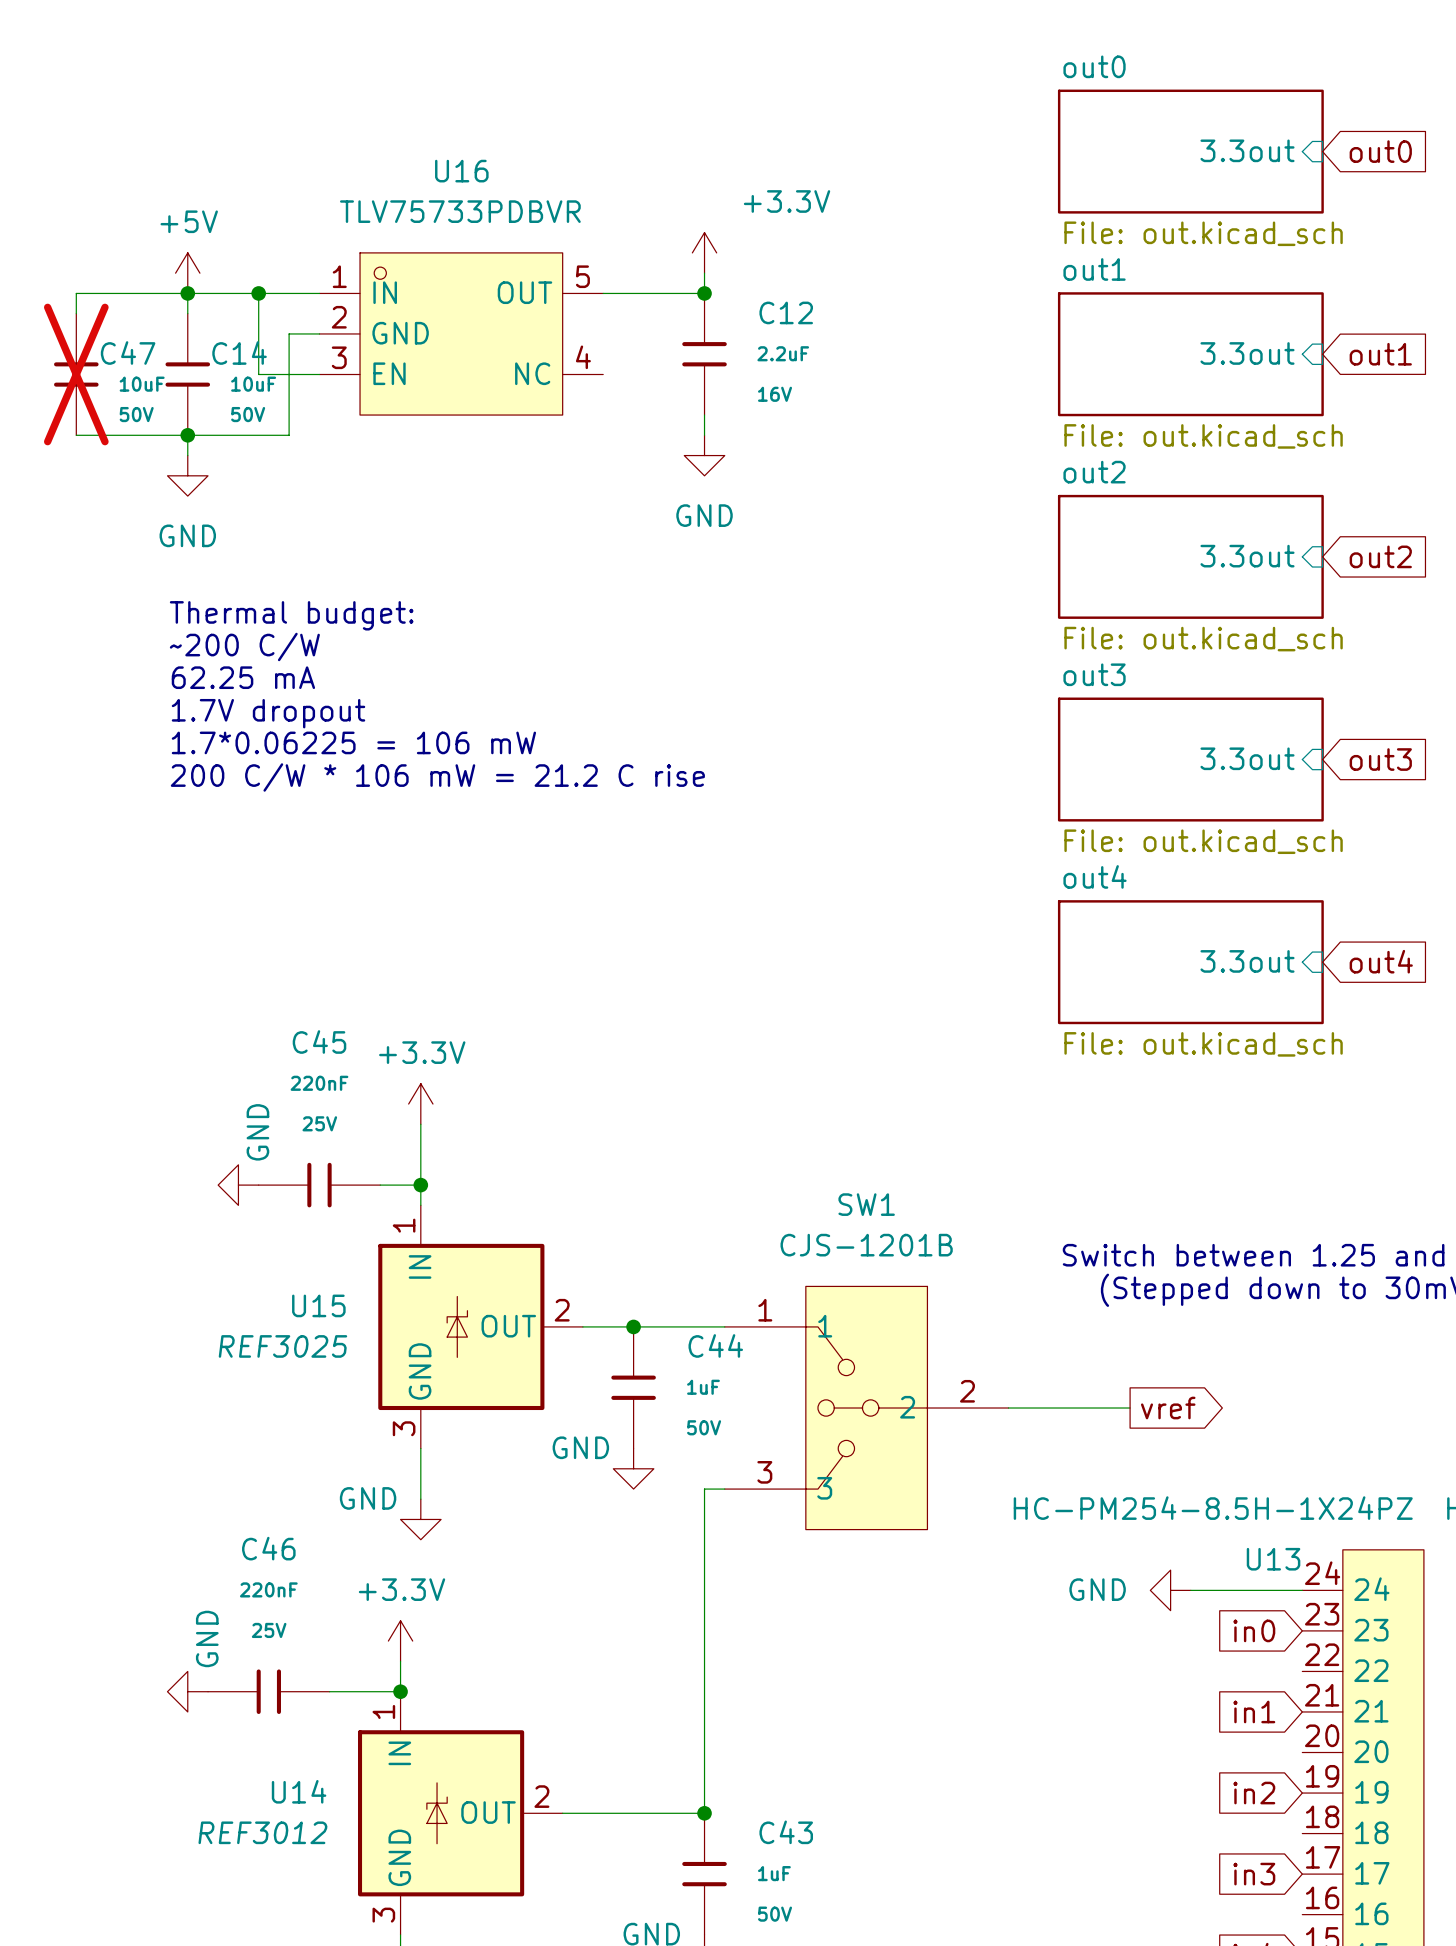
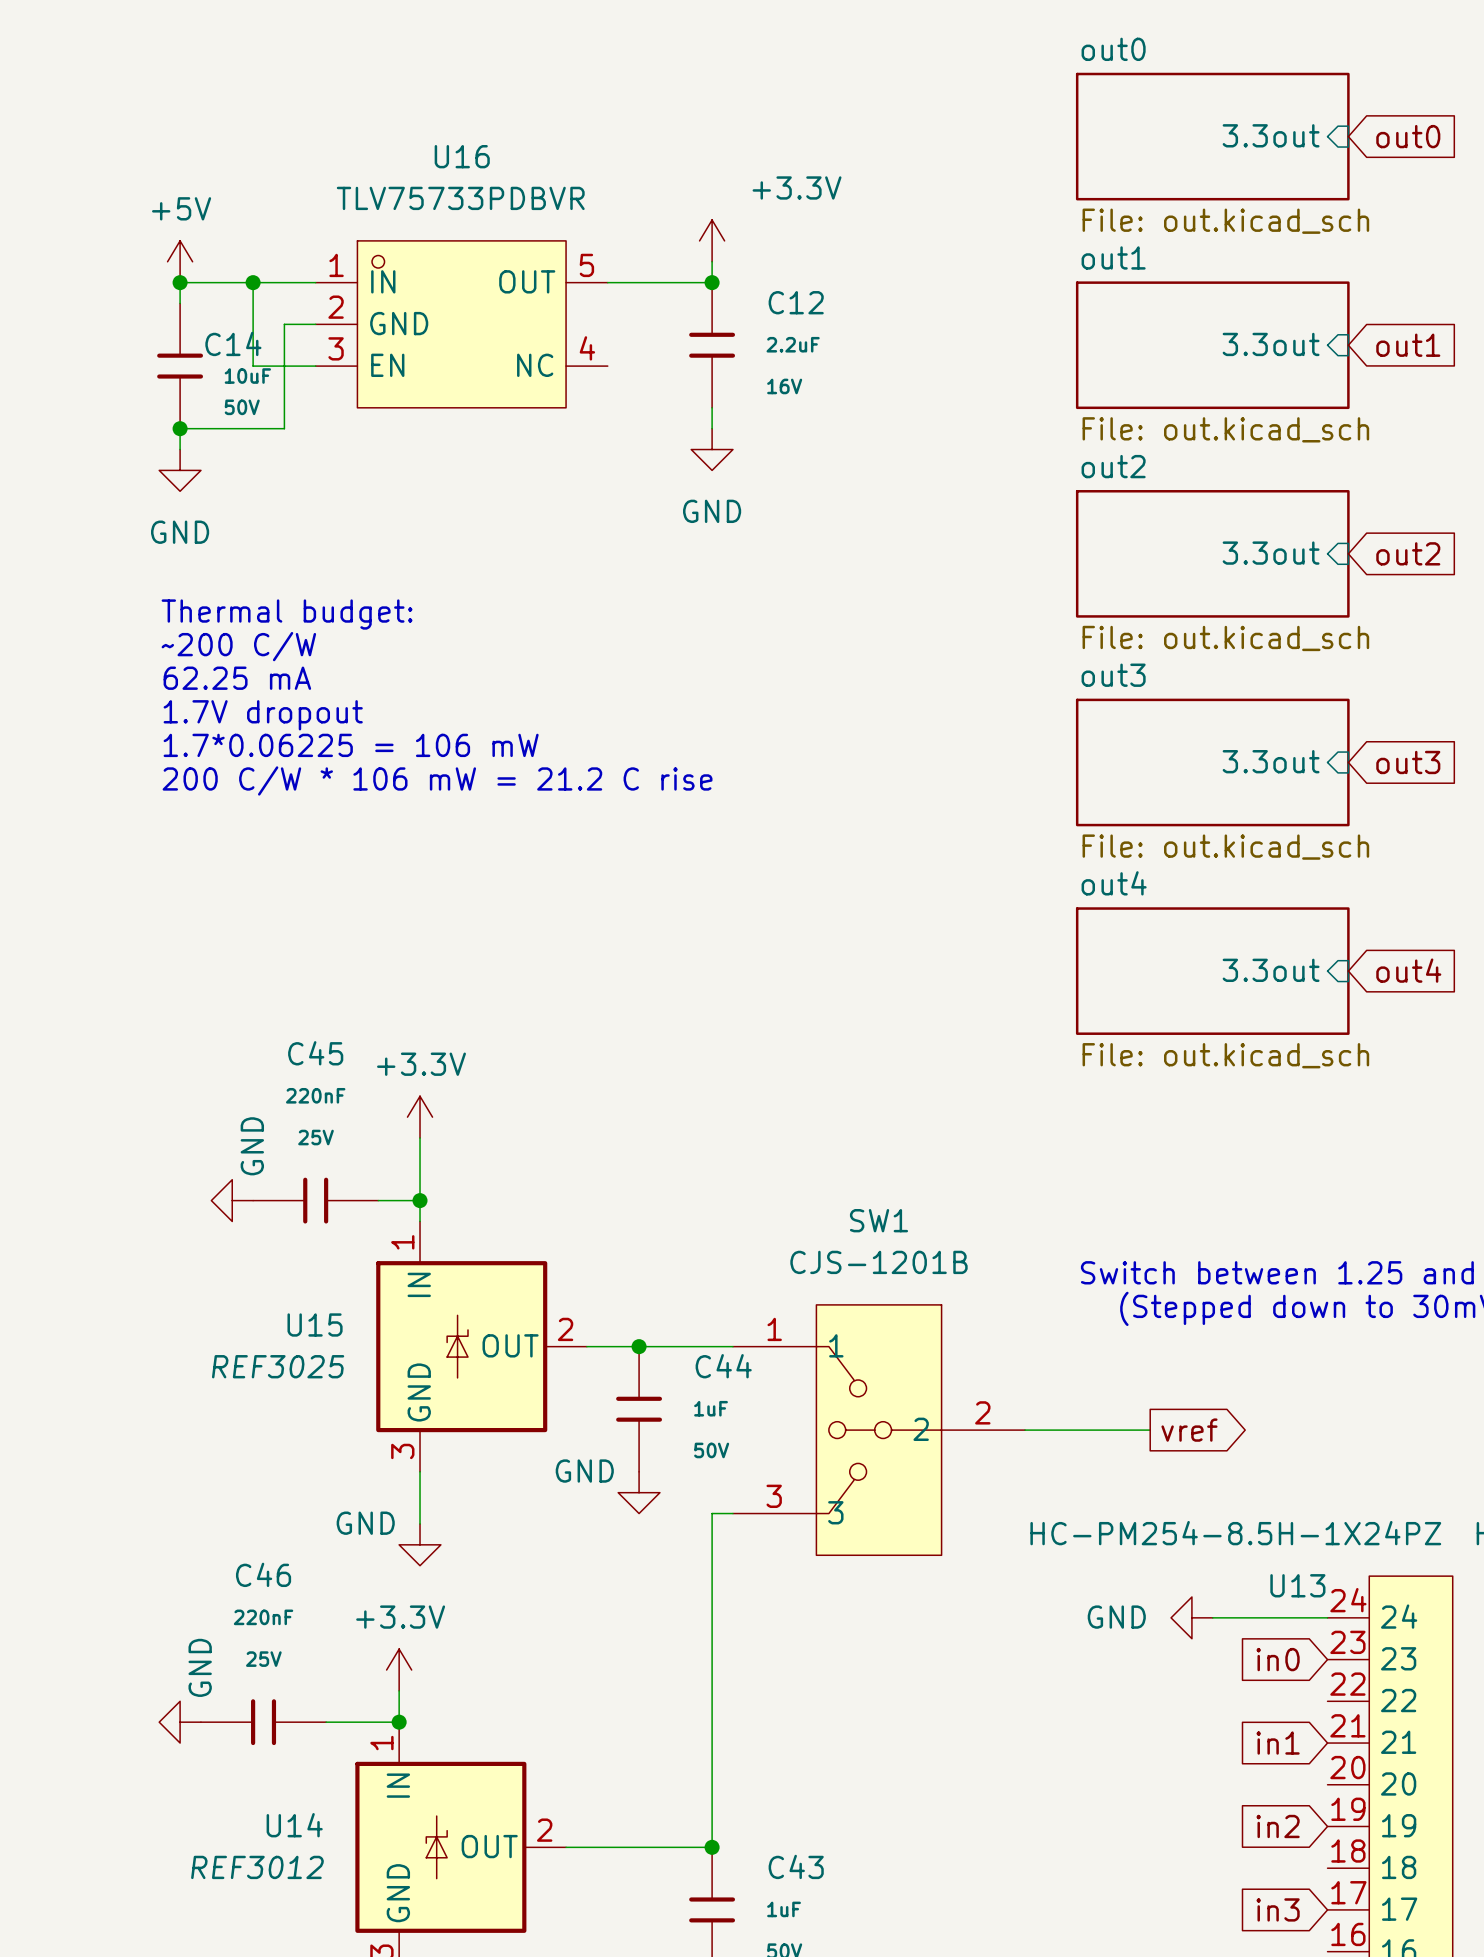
wire: (187, 293) (76, 293) (76, 313) -> none
C47: 10uF (76, 374) -> none
wire: (76, 435) (187, 435) -> none

